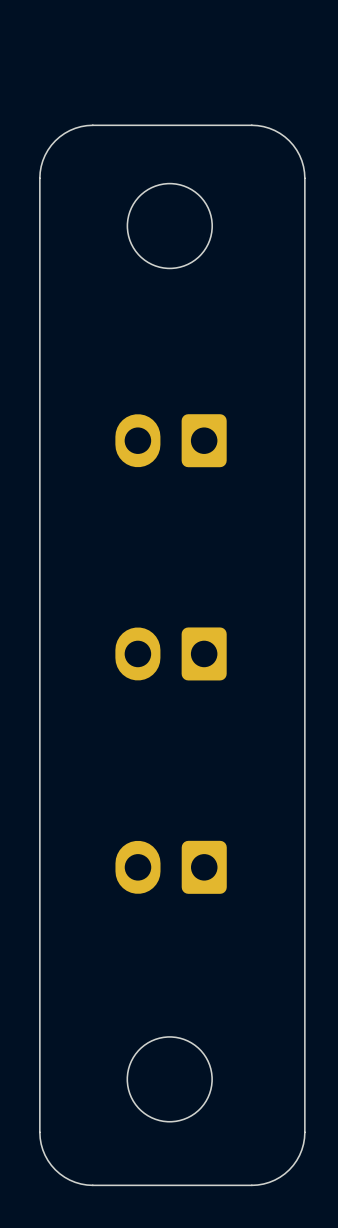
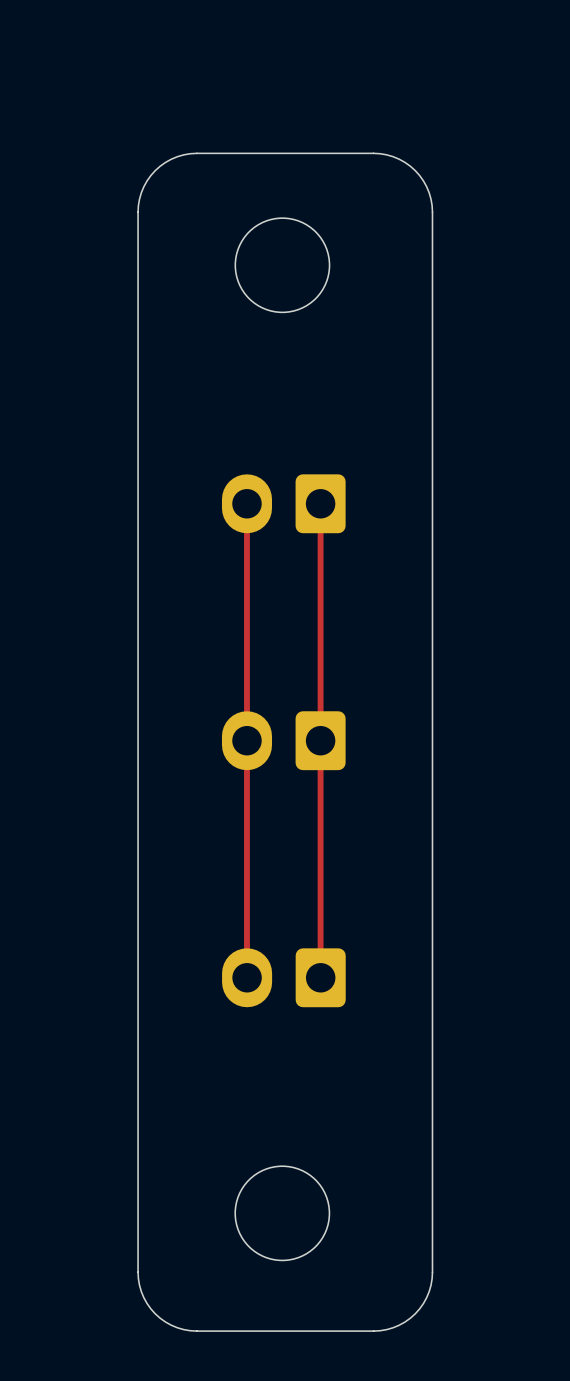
top track: none -> (246, 503) (246, 977)
top track: none -> (320, 503) (320, 977)

